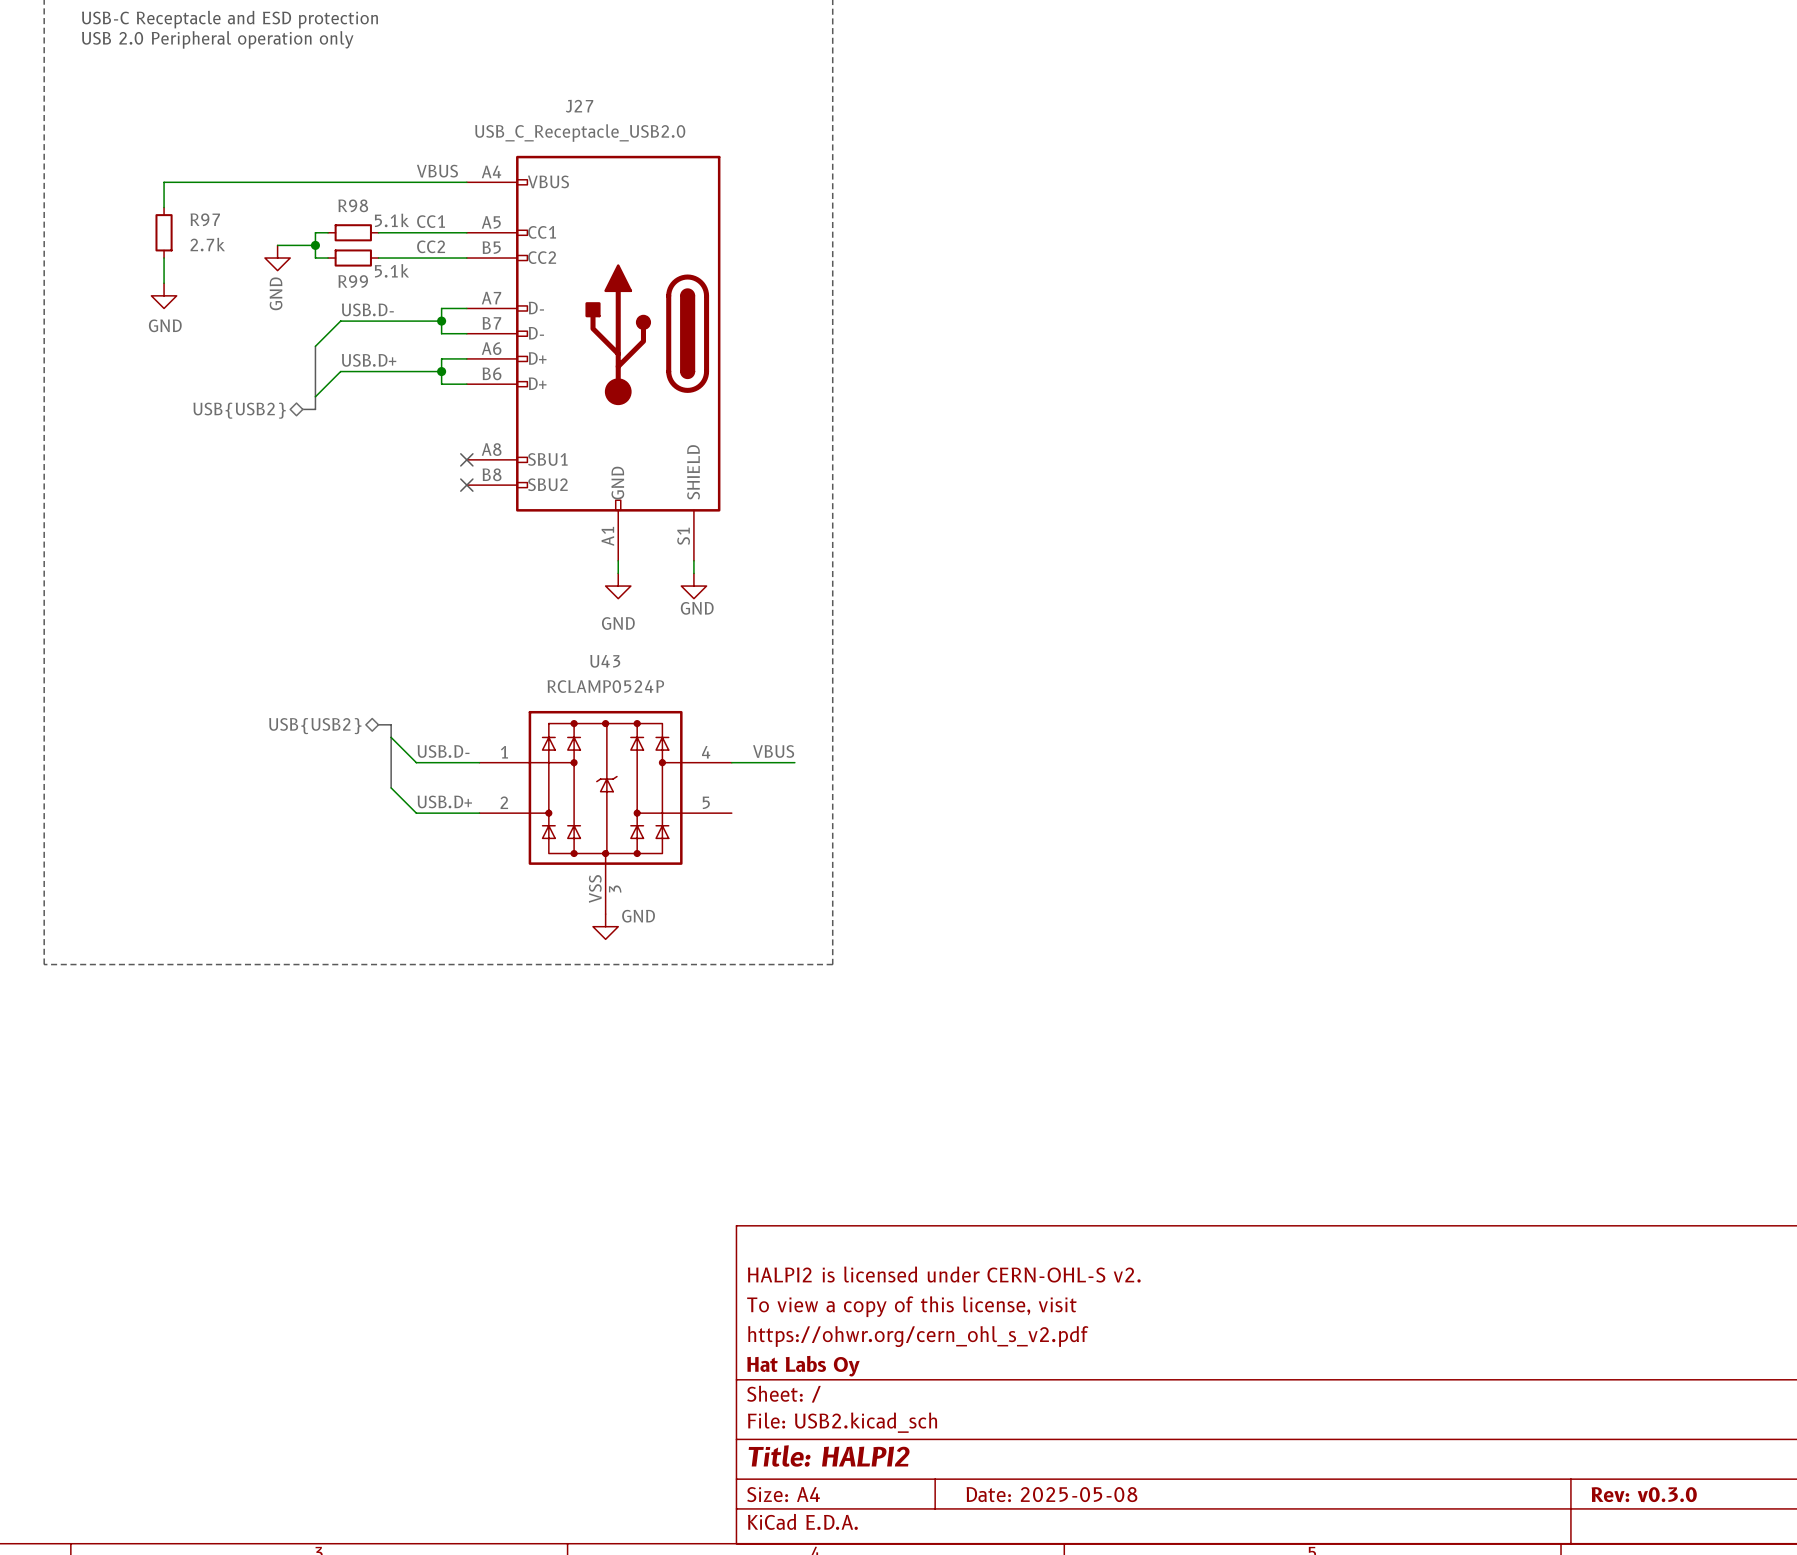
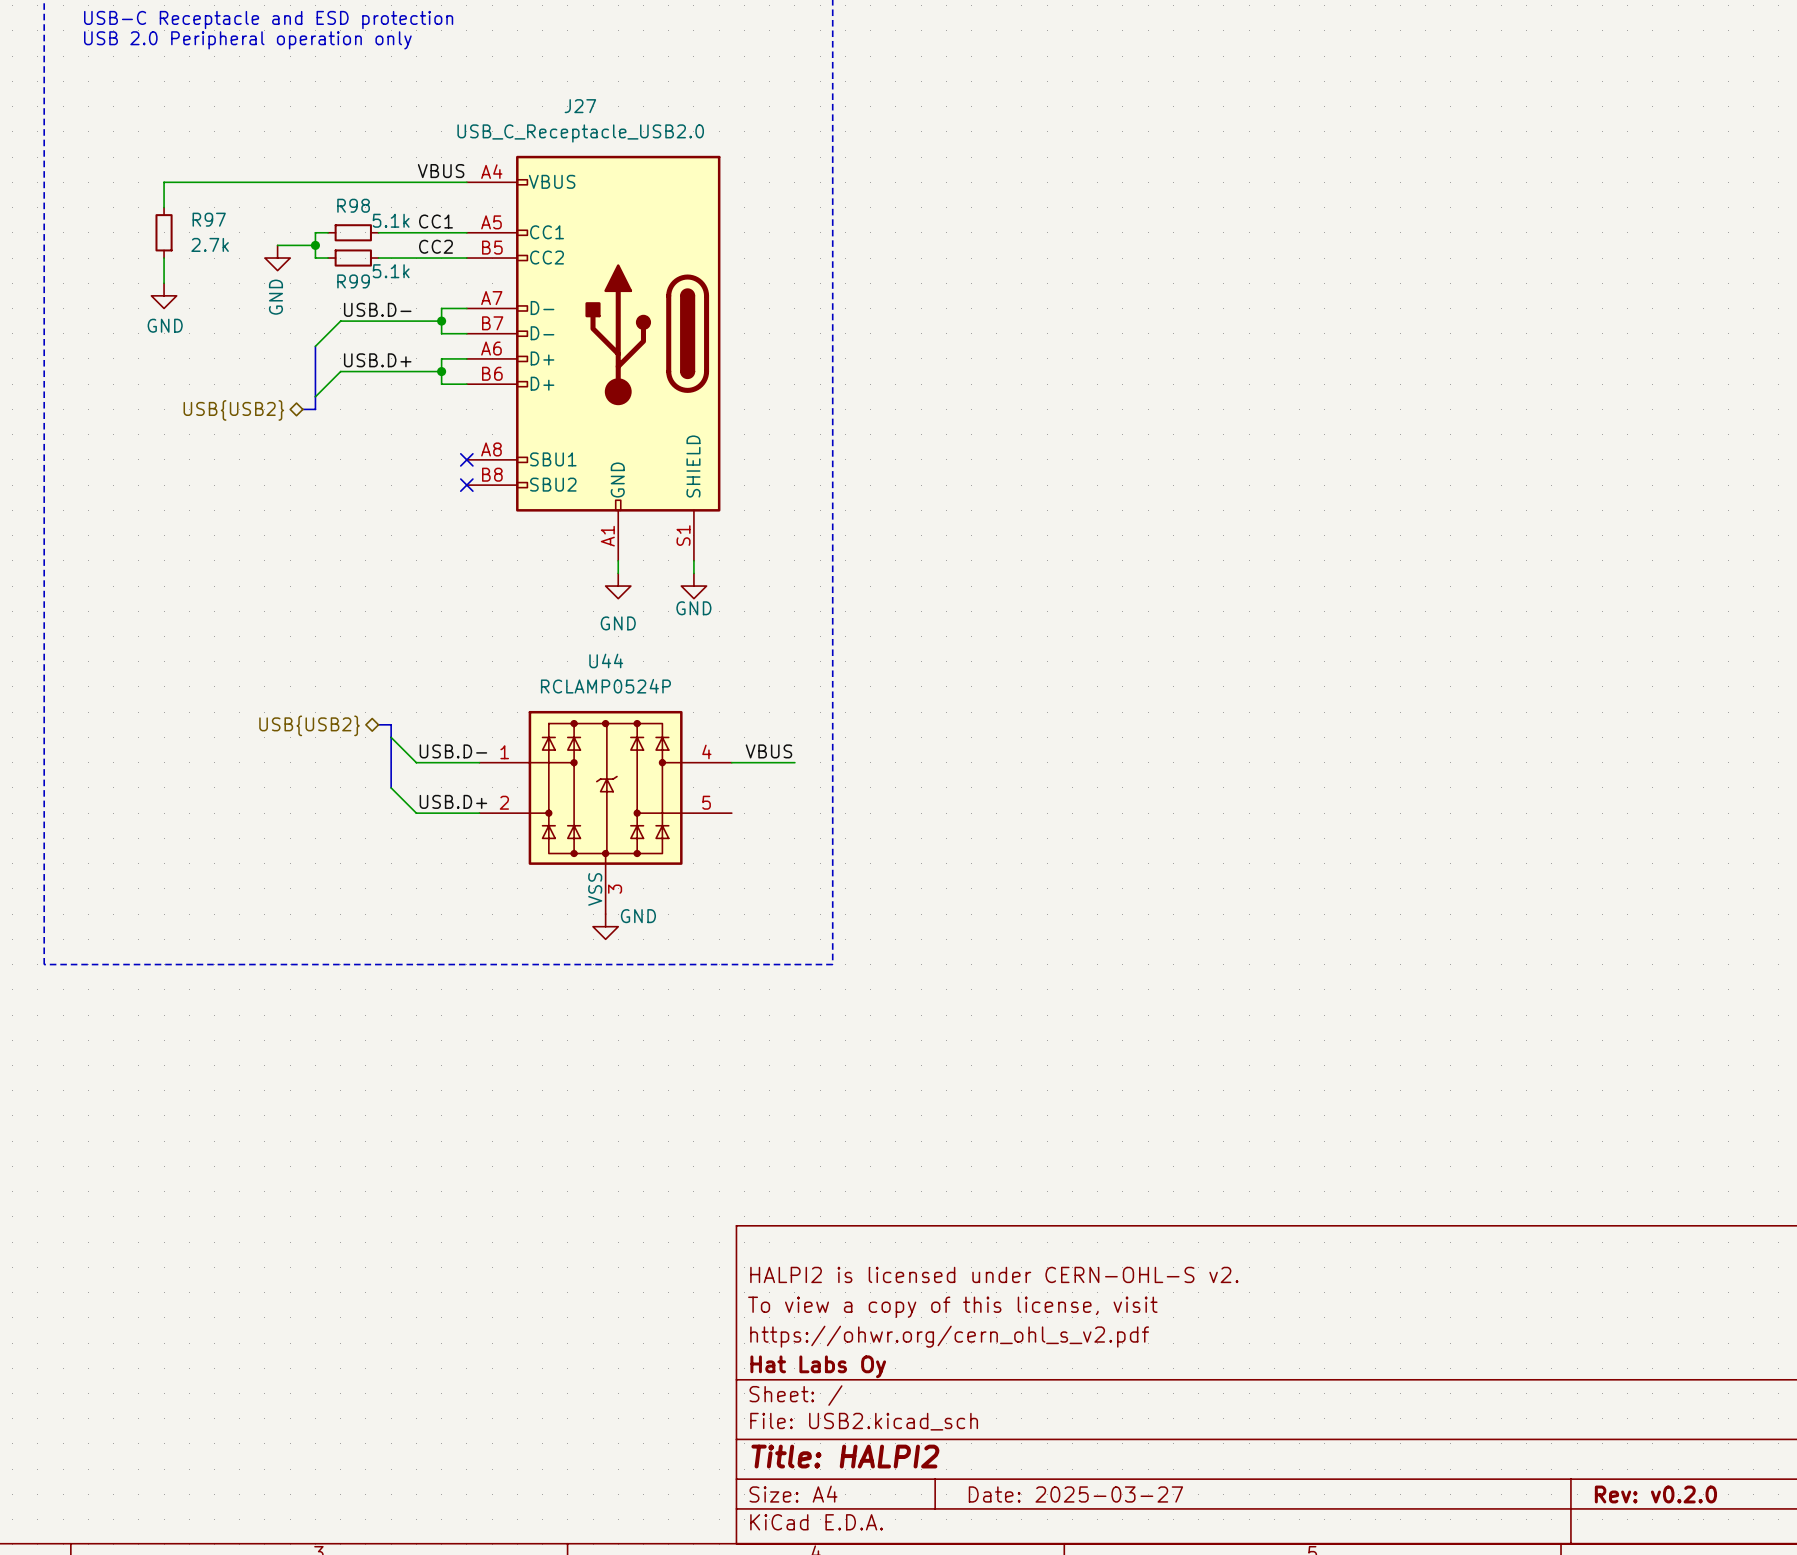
U43 name: U43 (605, 661) -> U44 (606, 660)
title block: Date: 2025-05-08 (1051, 1494) -> Date: 2025-03-27 (1075, 1494)
title block: Rev: v0.3.0 (1644, 1494) -> Rev: v0.2.0 (1655, 1494)

